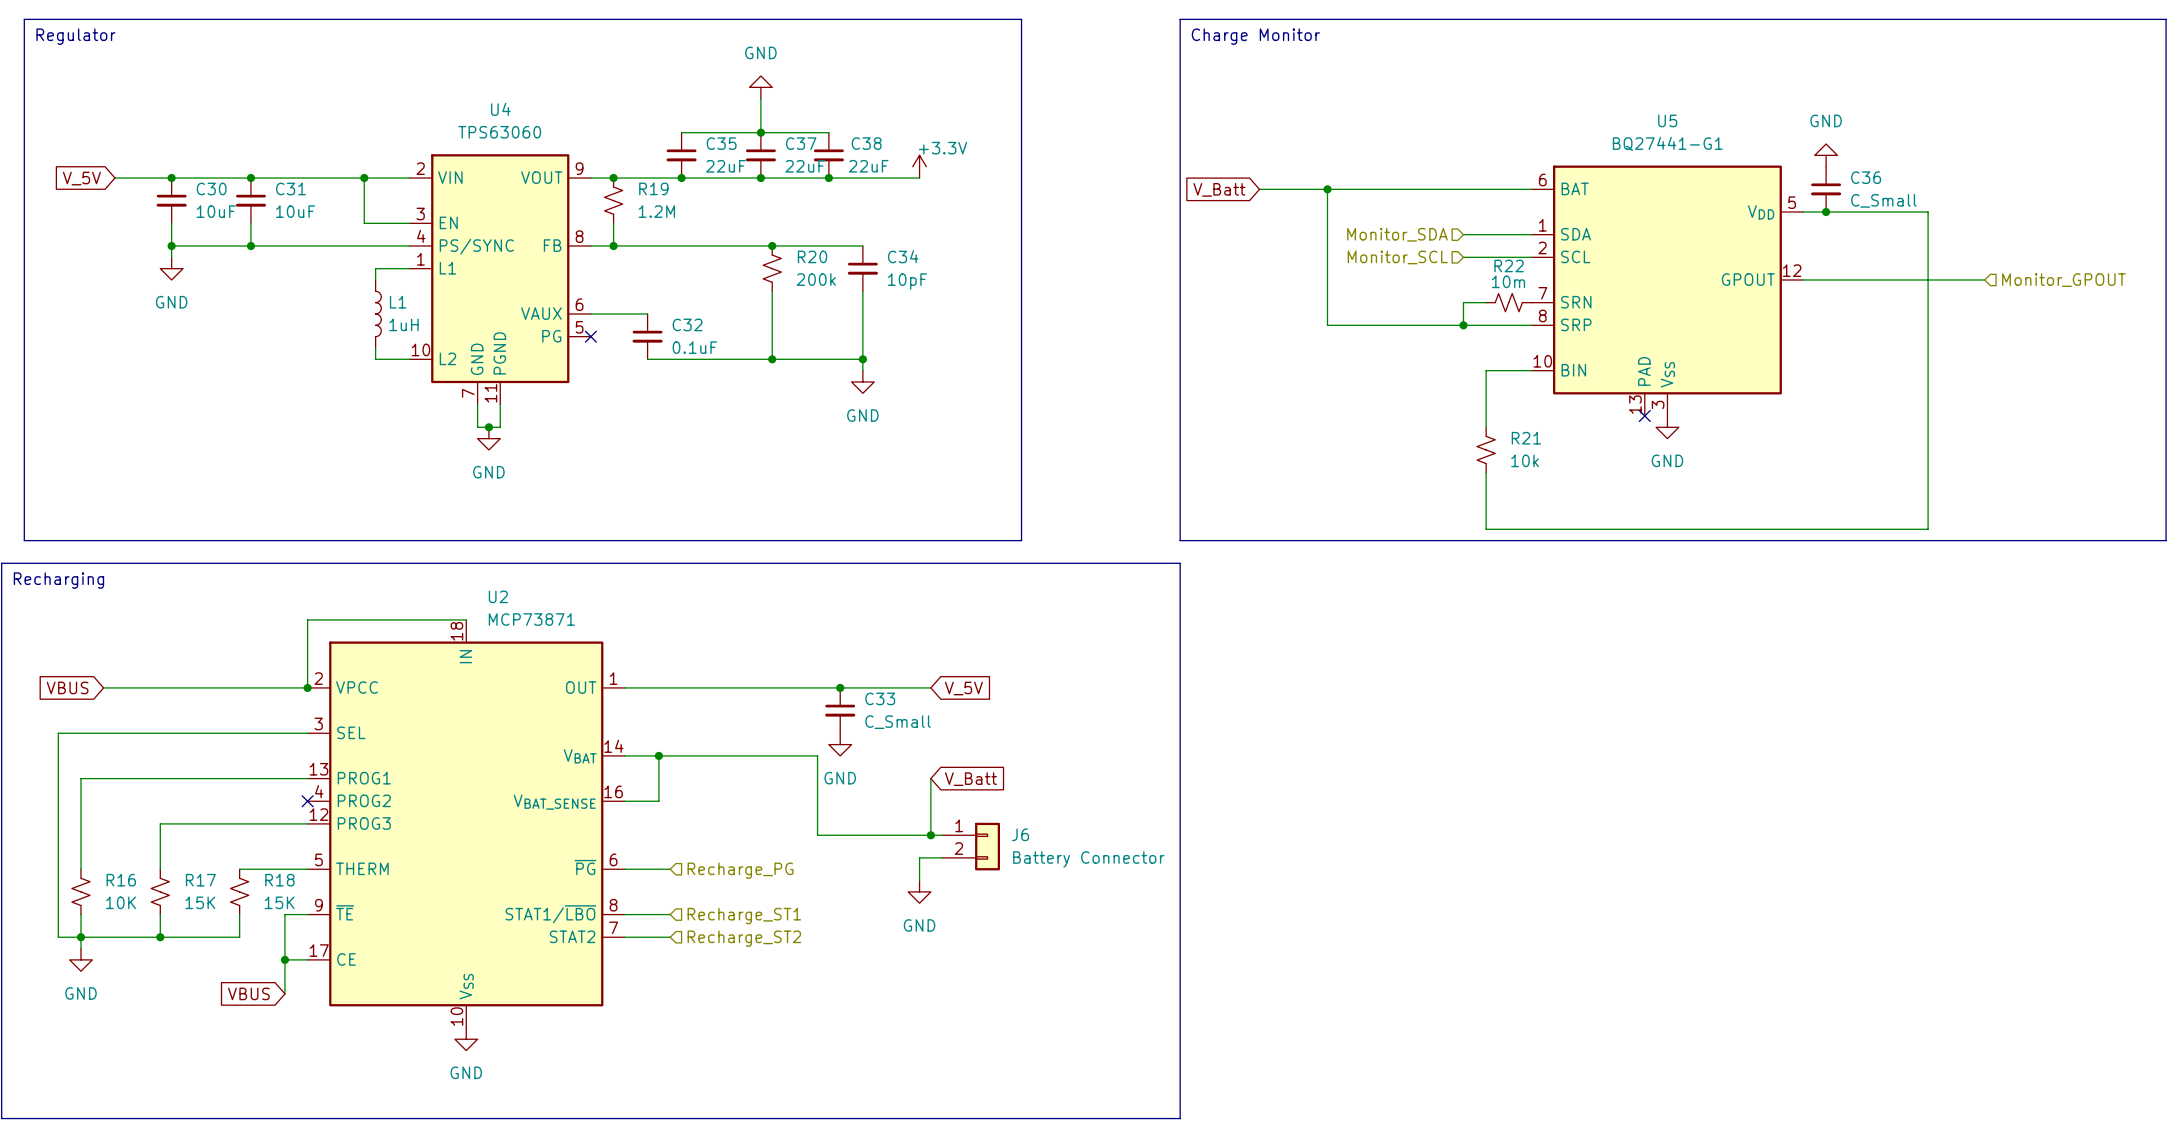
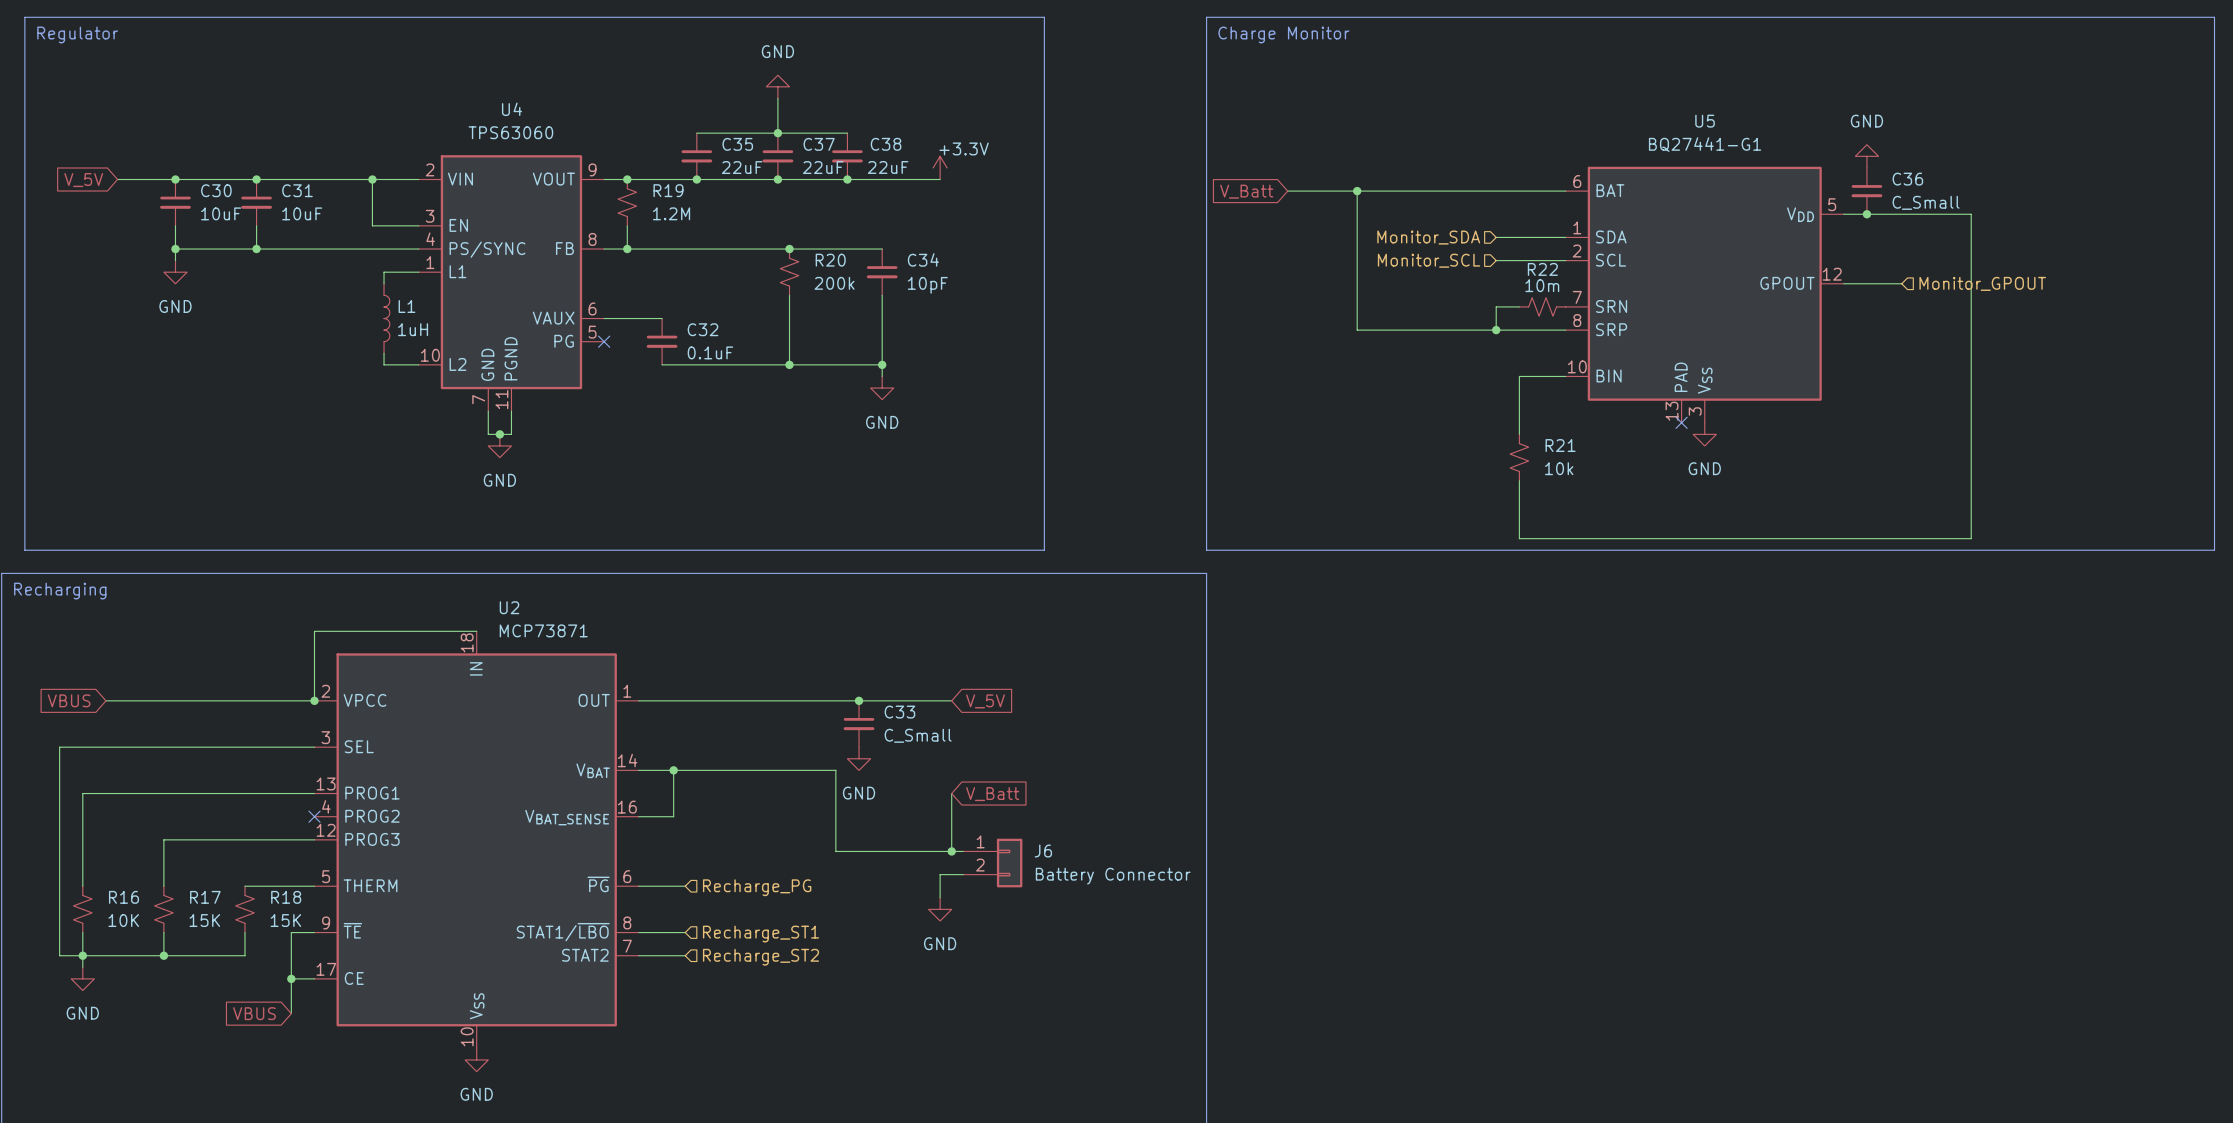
wire: (1860, 280) (1984, 280) -> none
hierarchical label position: Monitor_GPOUT (2063, 280) -> Monitor_GPOUT (1982, 283)

